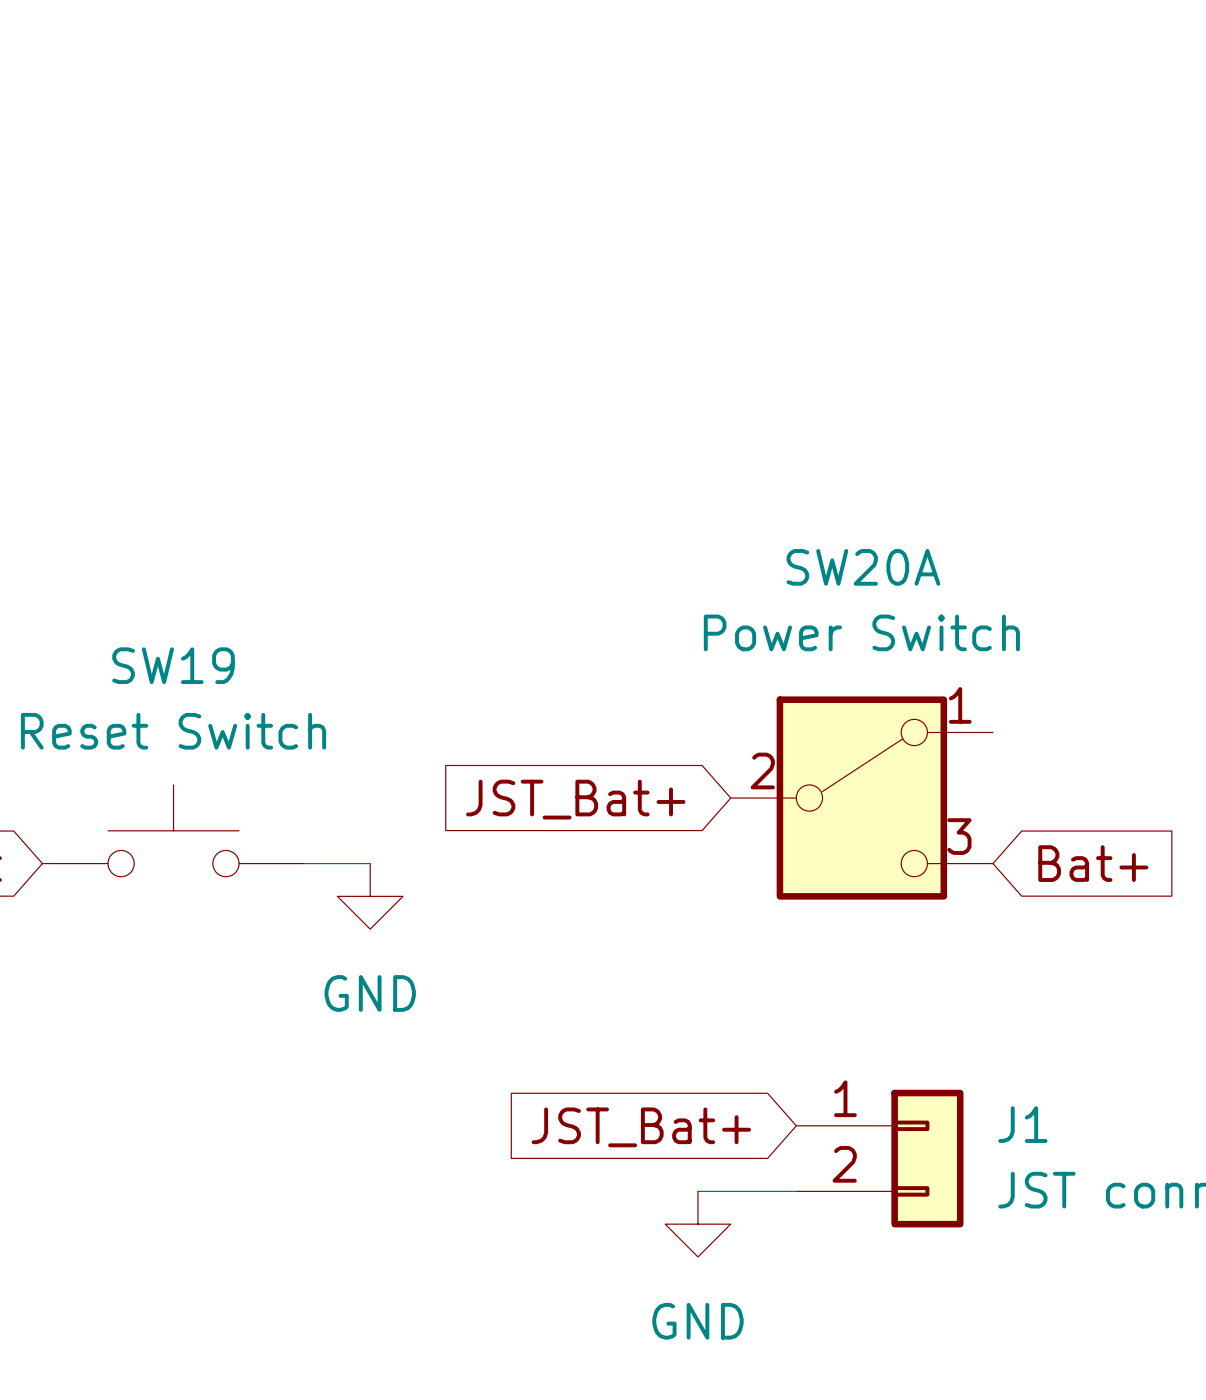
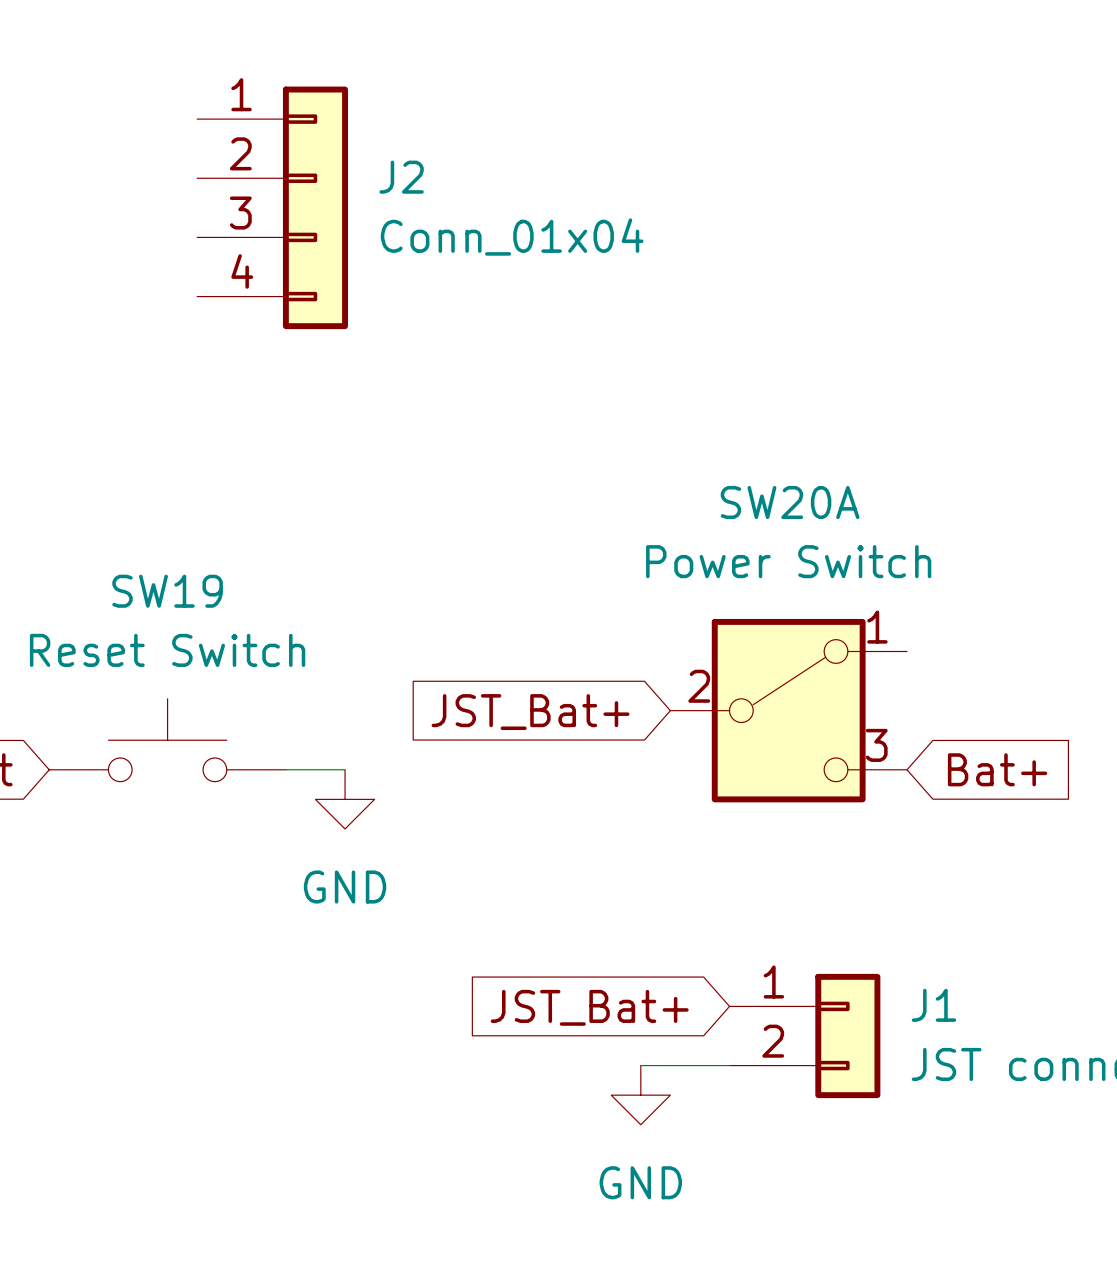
J2: none -> Conn_01x04 (272, 207)

